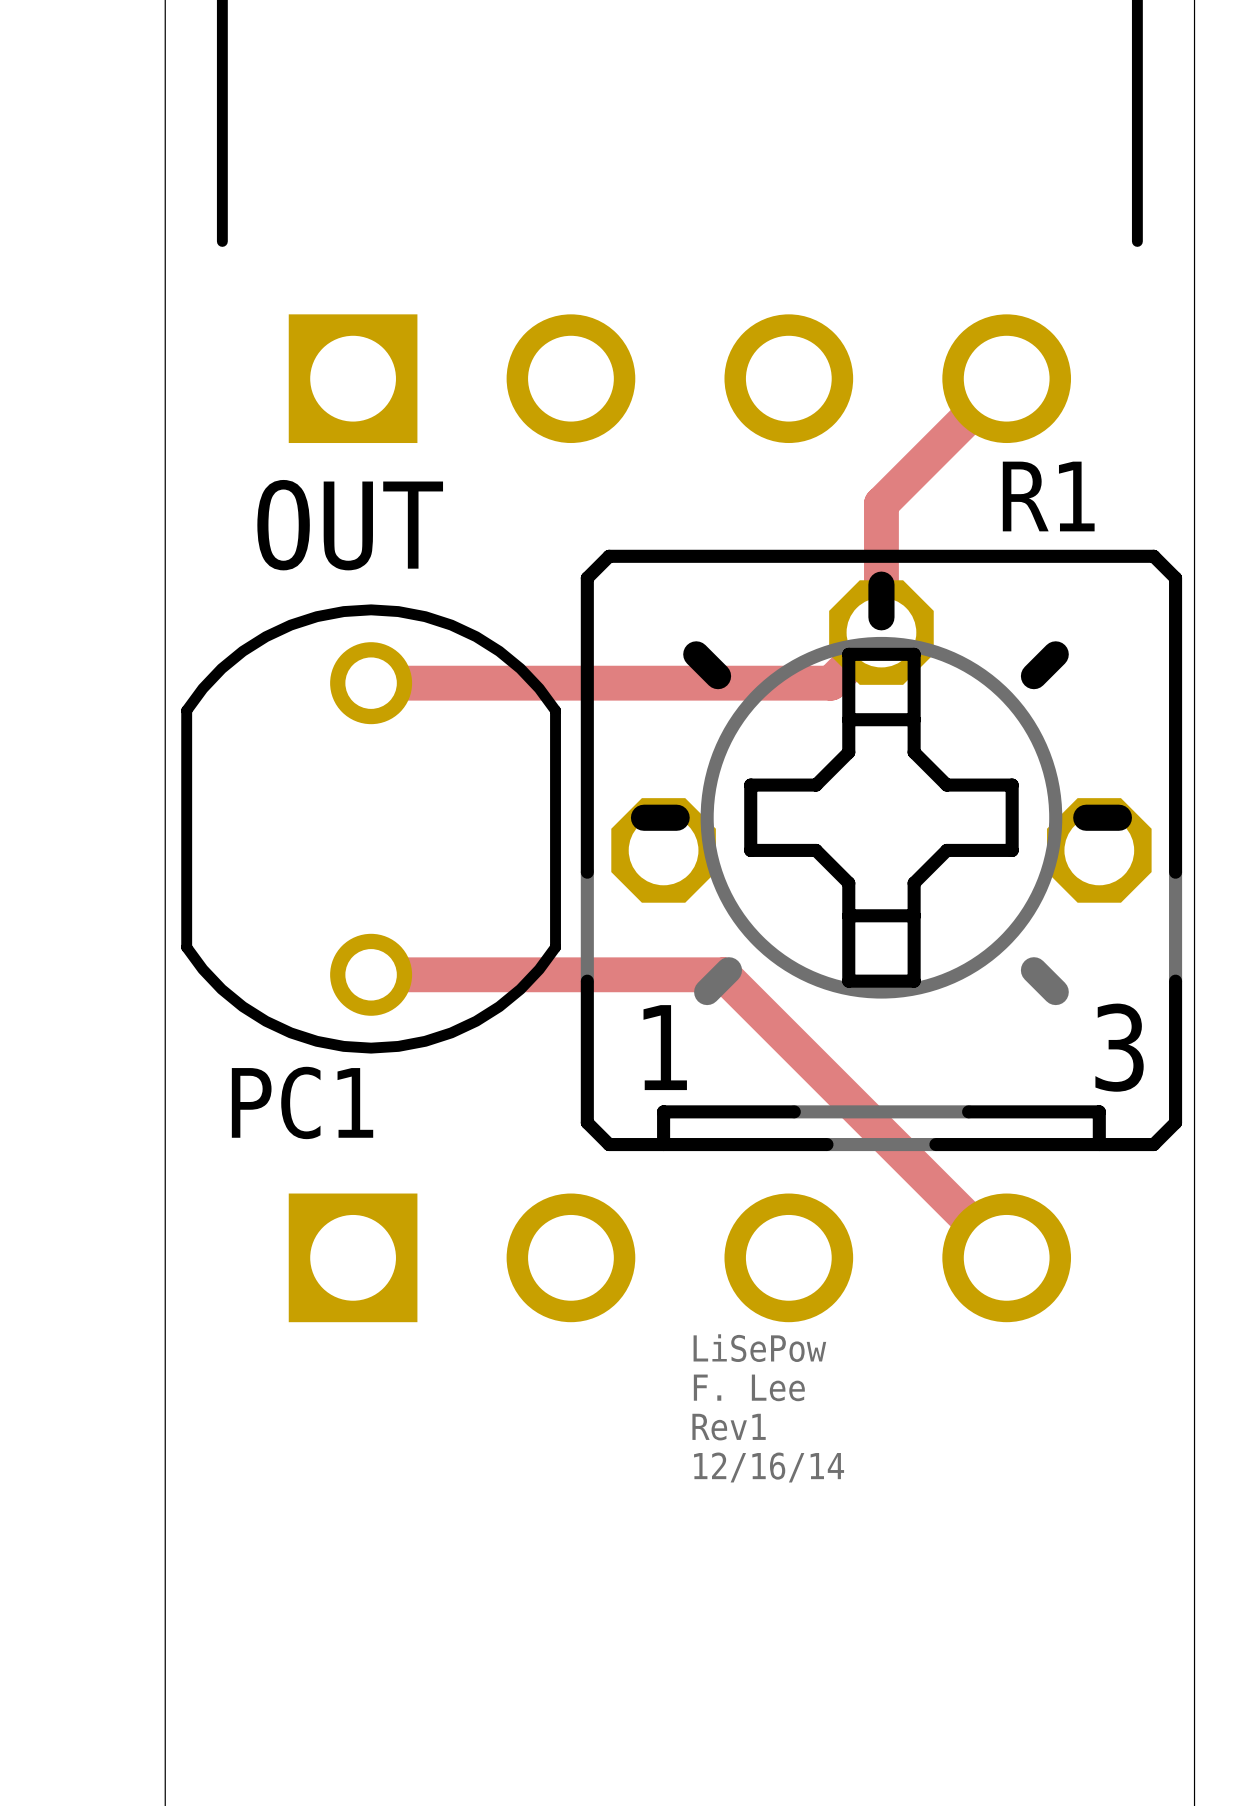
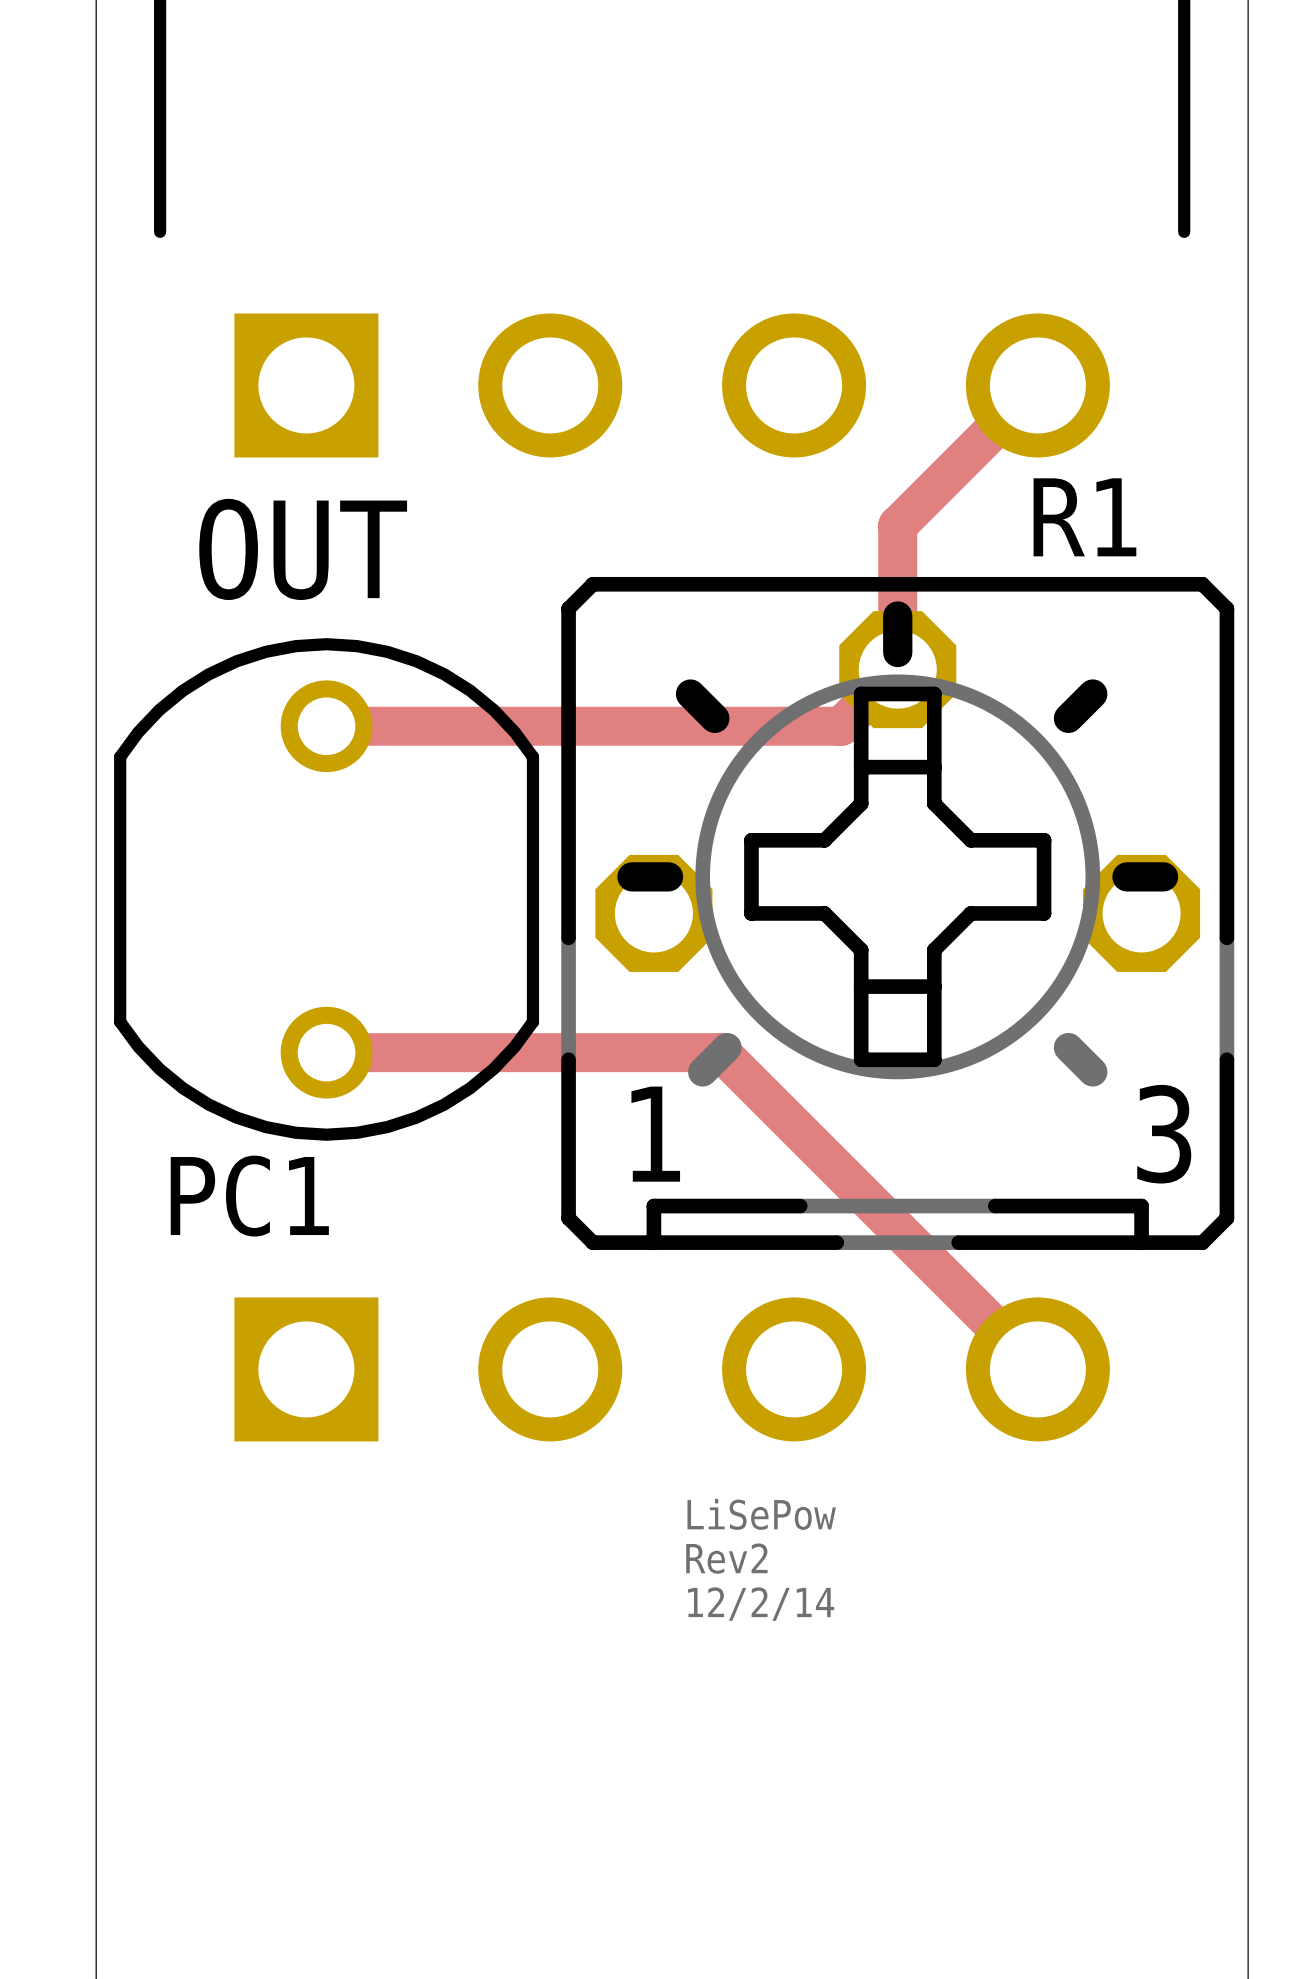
text position: LiSePow (759, 1348) -> LiSePow (761, 1514)
text: F. Lee (749, 1387) -> none
text: Rev1 (729, 1427) -> Rev2 (726, 1558)
text: 12/16/14 (769, 1467) -> 12/2/14 (761, 1604)

